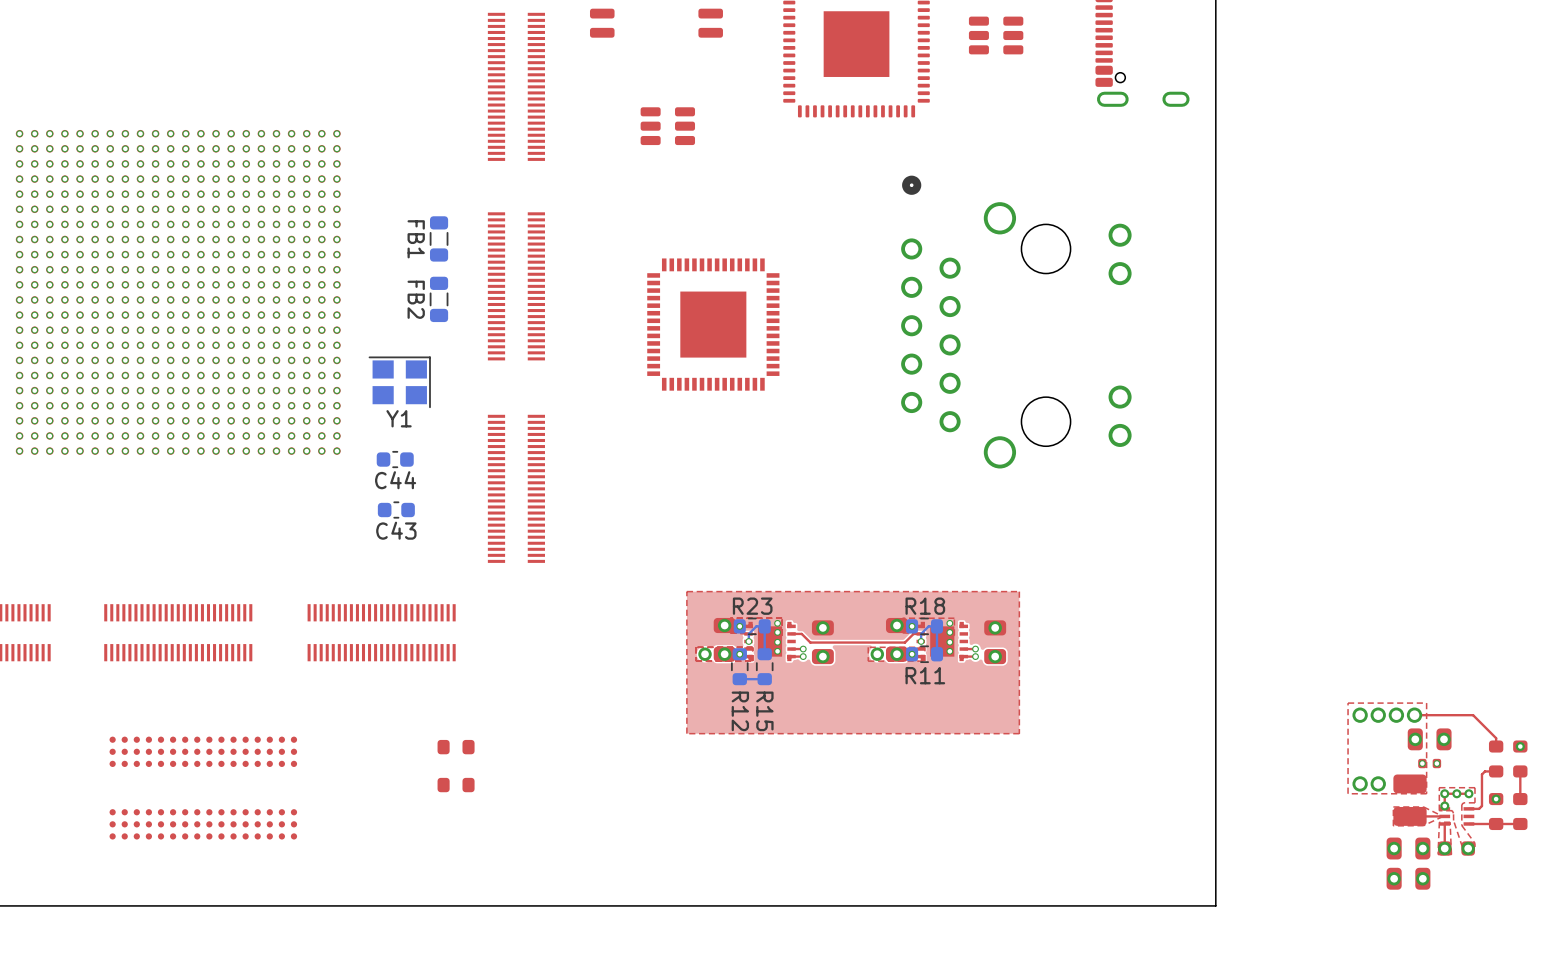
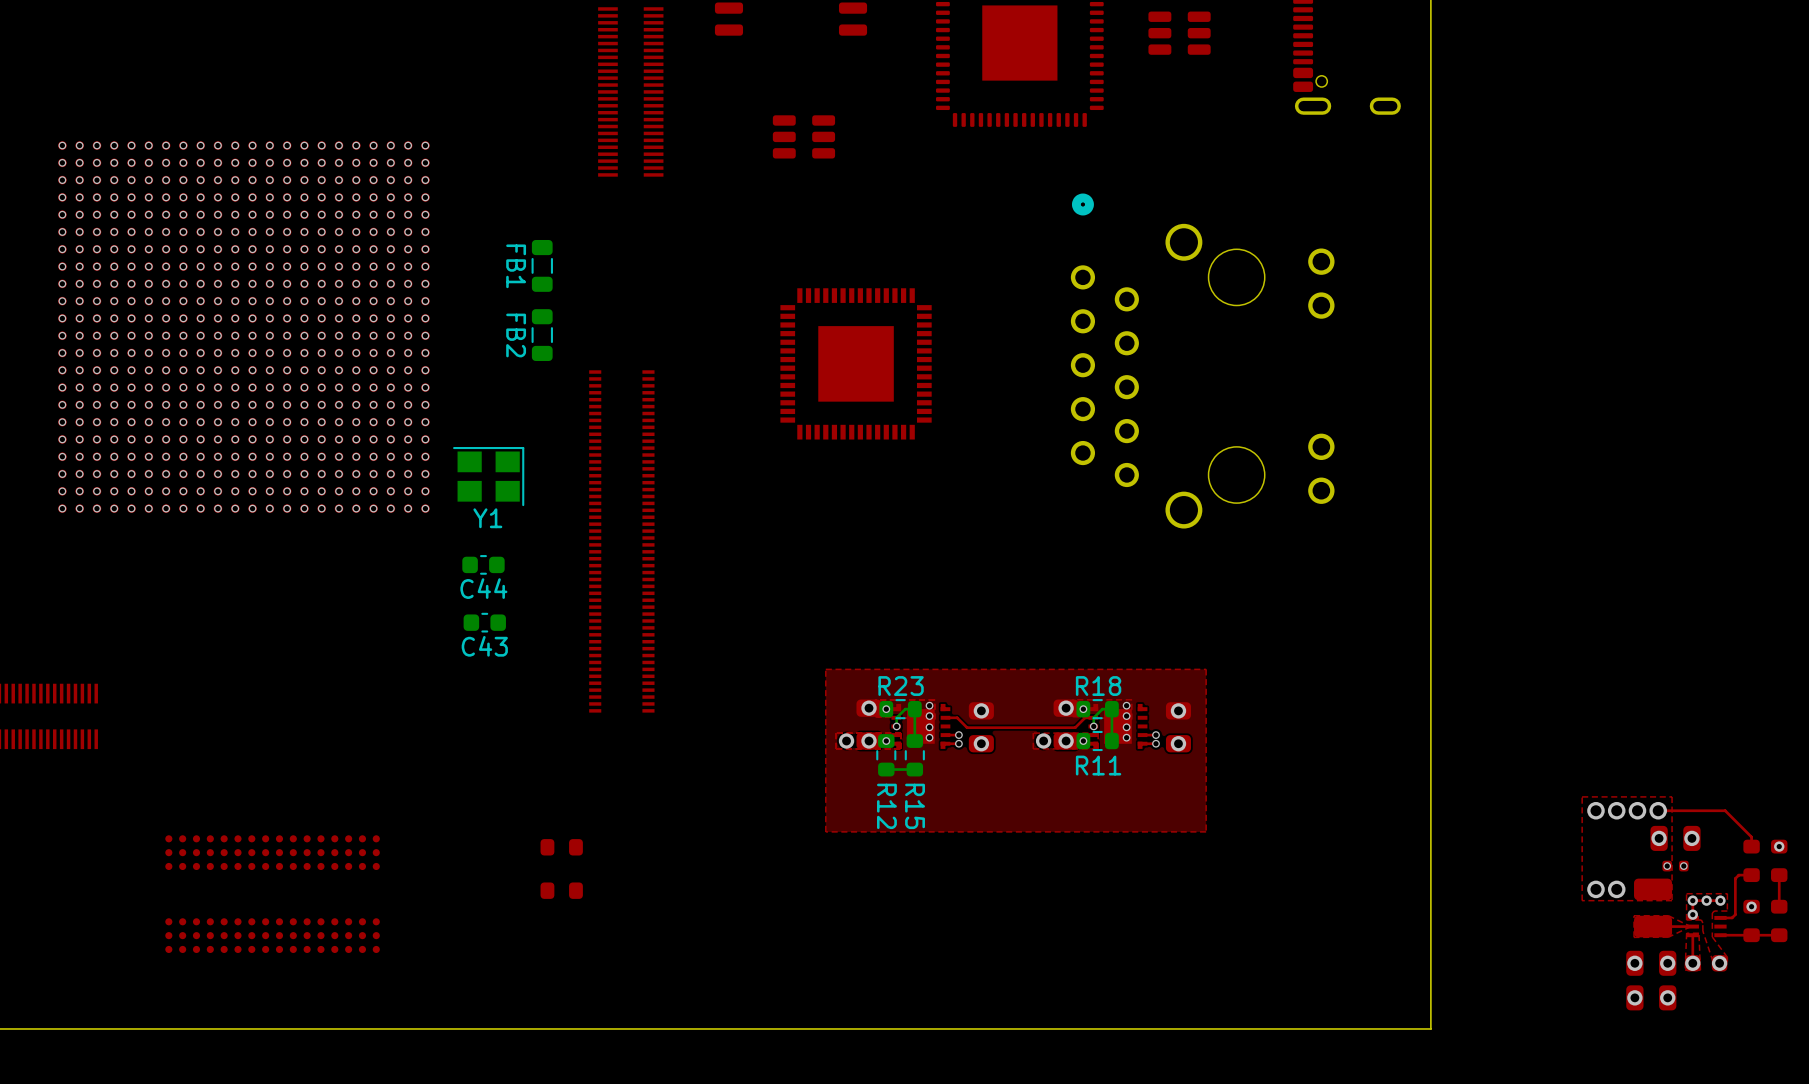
part: (516, 286) -> none
Y1 position: (399, 382) -> (488, 476)
part footprint: [487, 414, 545, 563] -> [589, 370, 655, 713]
C44 position: (395, 459) -> (483, 564)
C43 position: (396, 510) -> (484, 622)
part: (178, 632) -> none
part: (381, 632) -> none

